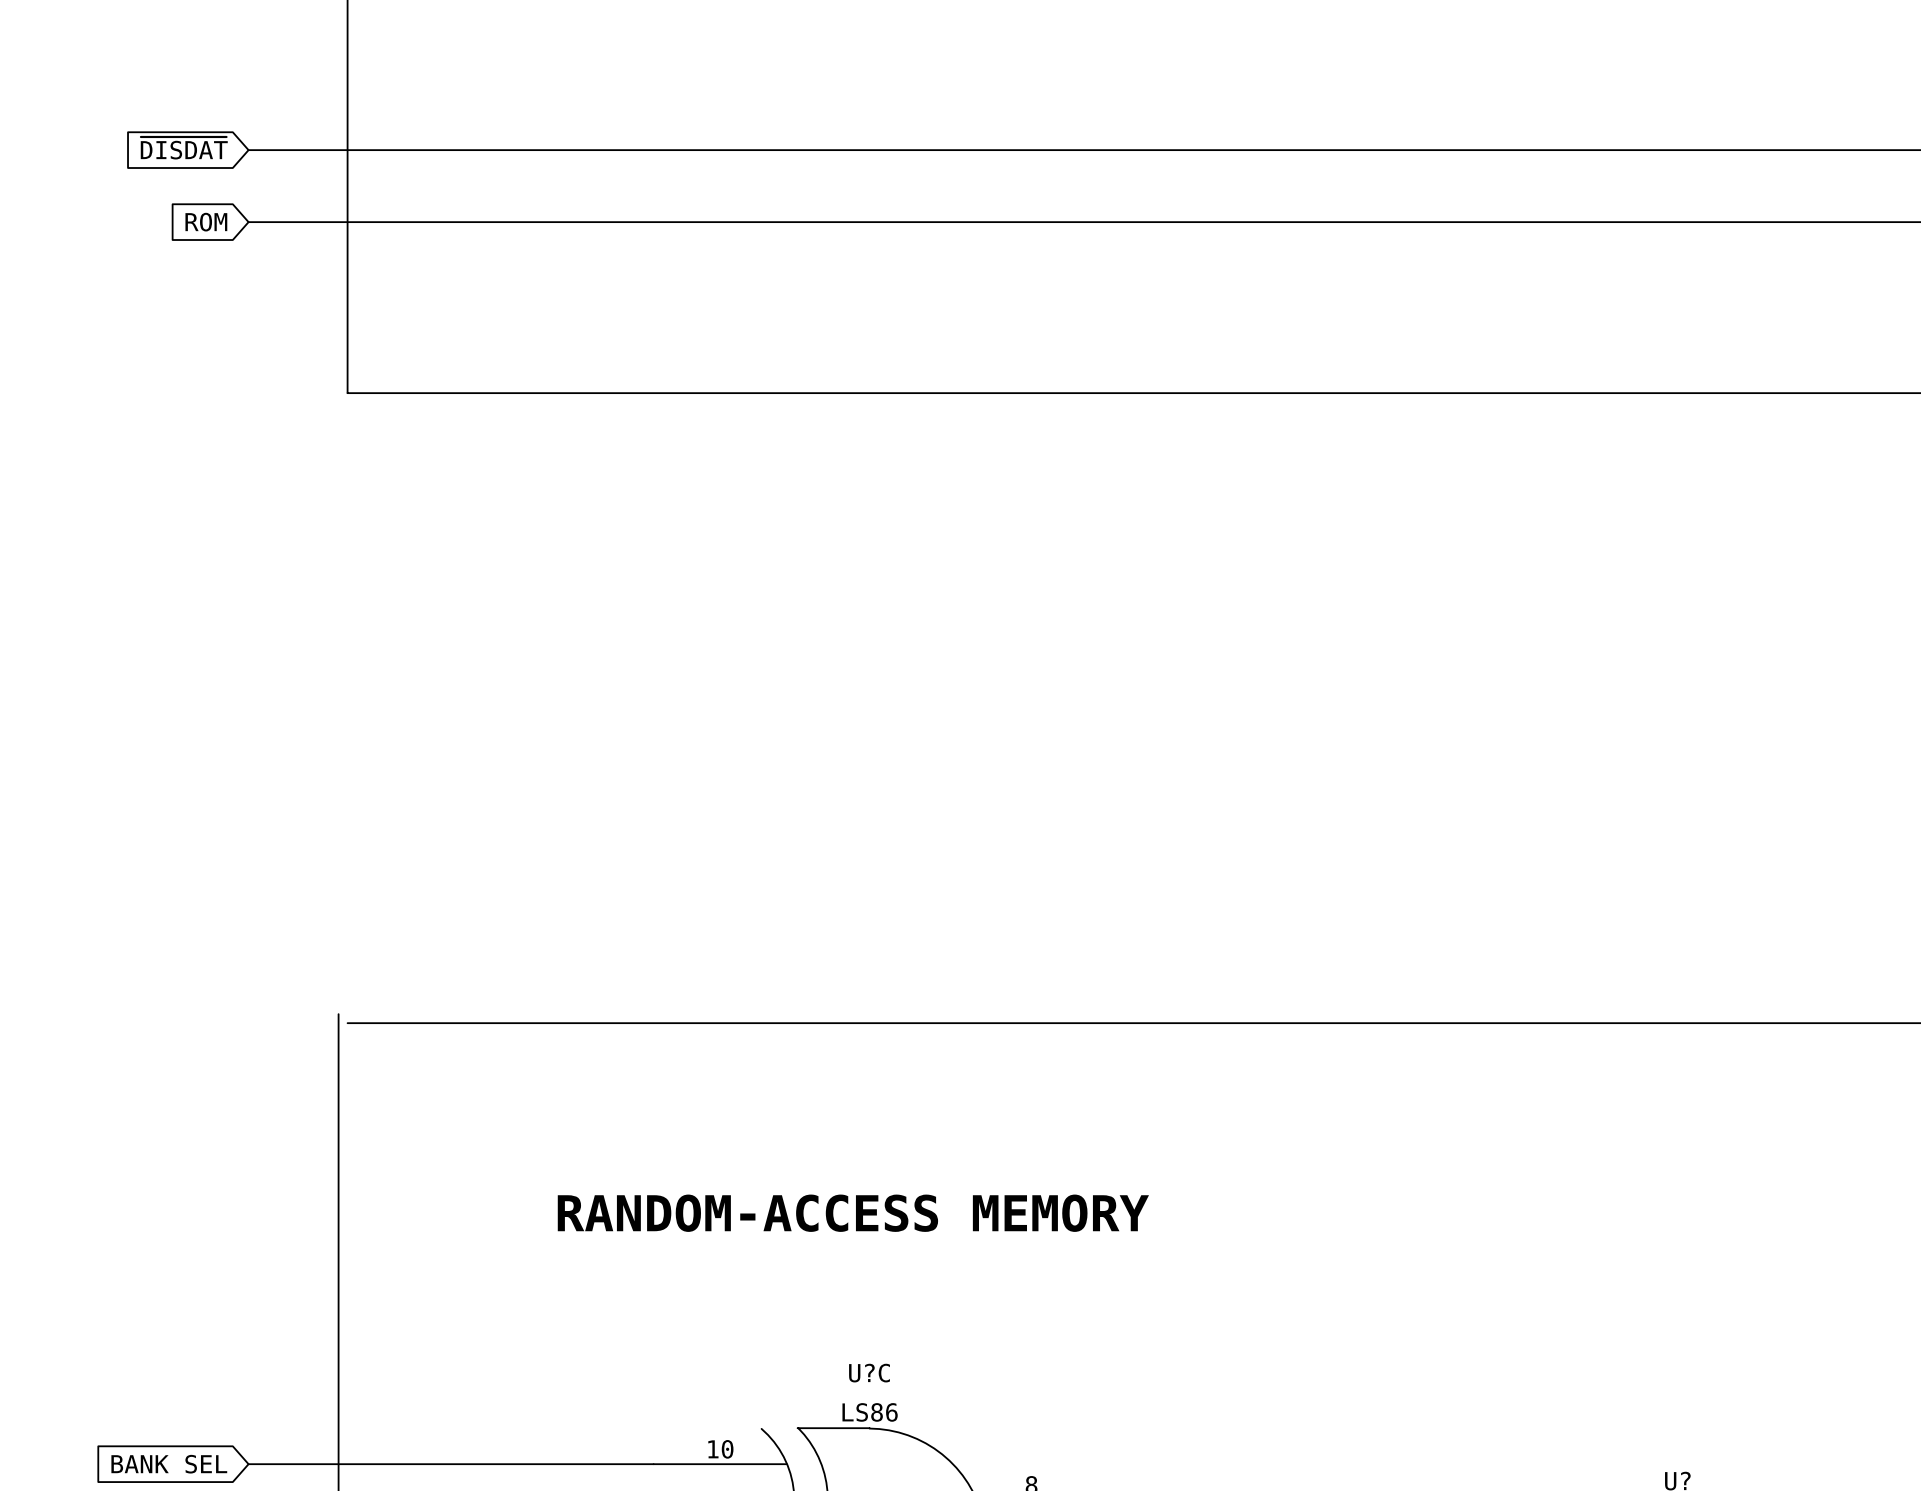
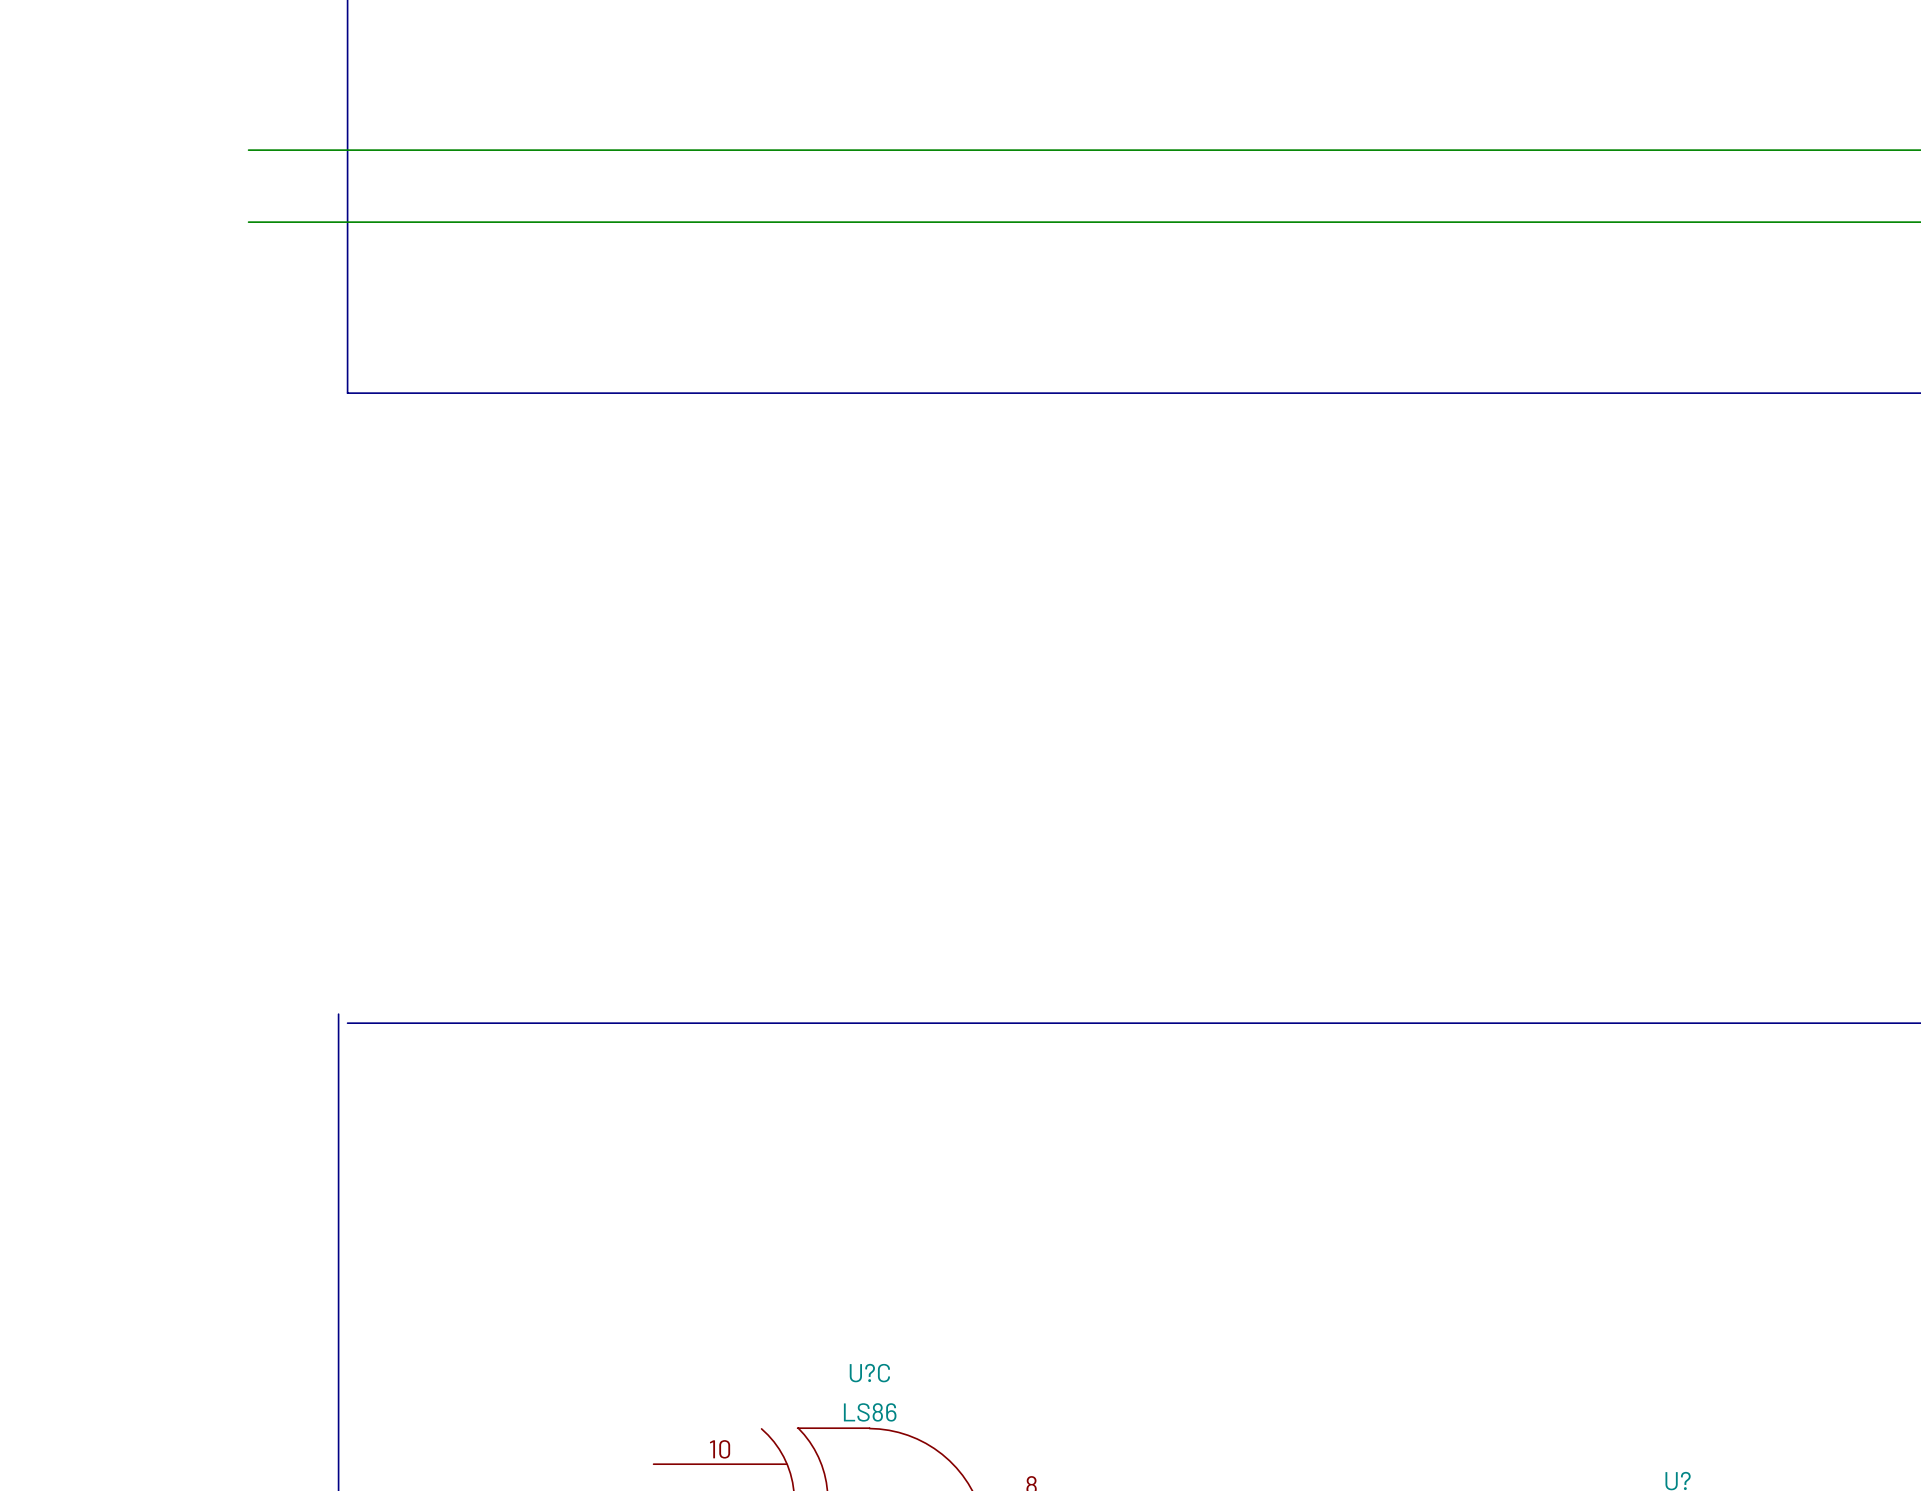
global label: ~{DISDAT} (184, 148) -> none
global label: ROM (206, 222) -> none
text: RANDOM-ACCESS MEMORY (853, 1213) -> none
global label: BANK SEL (169, 1464) -> none
wire: (248, 1464) (653, 1464) -> none

